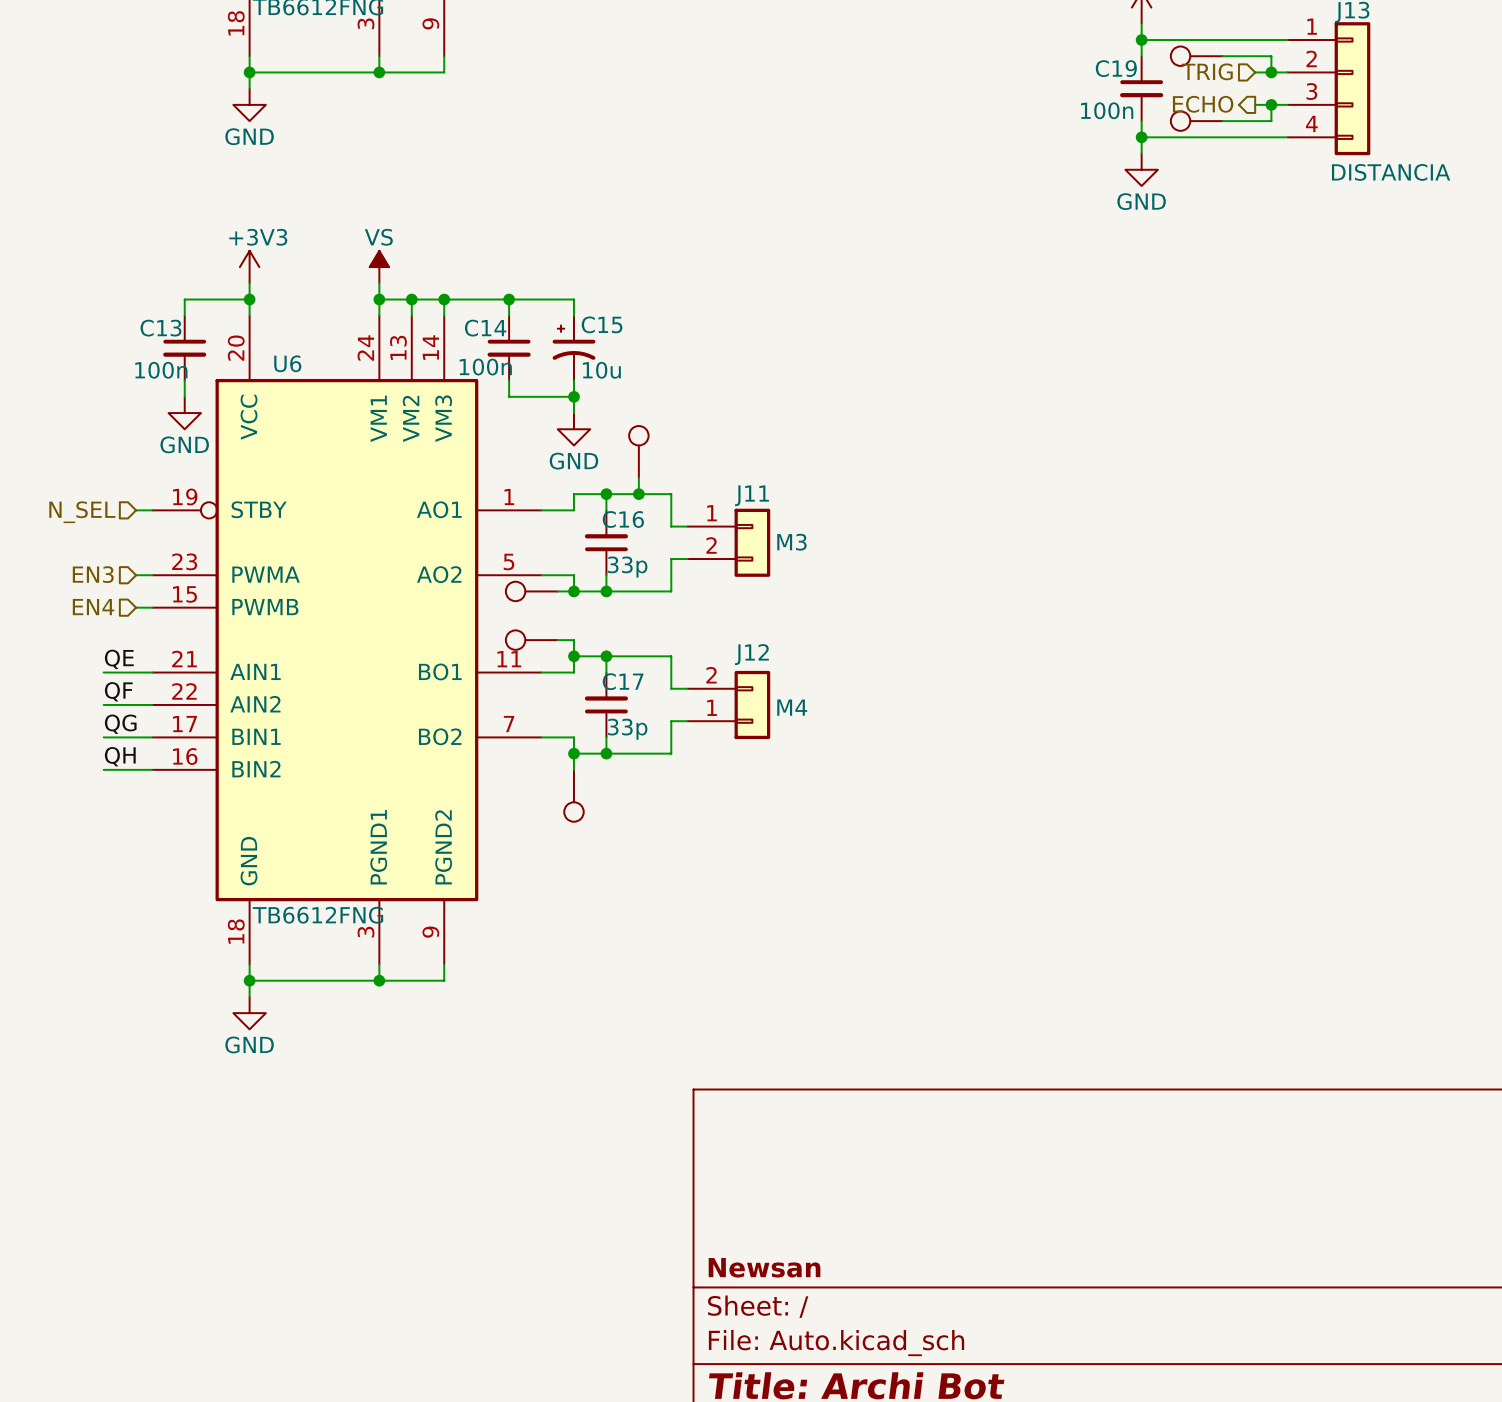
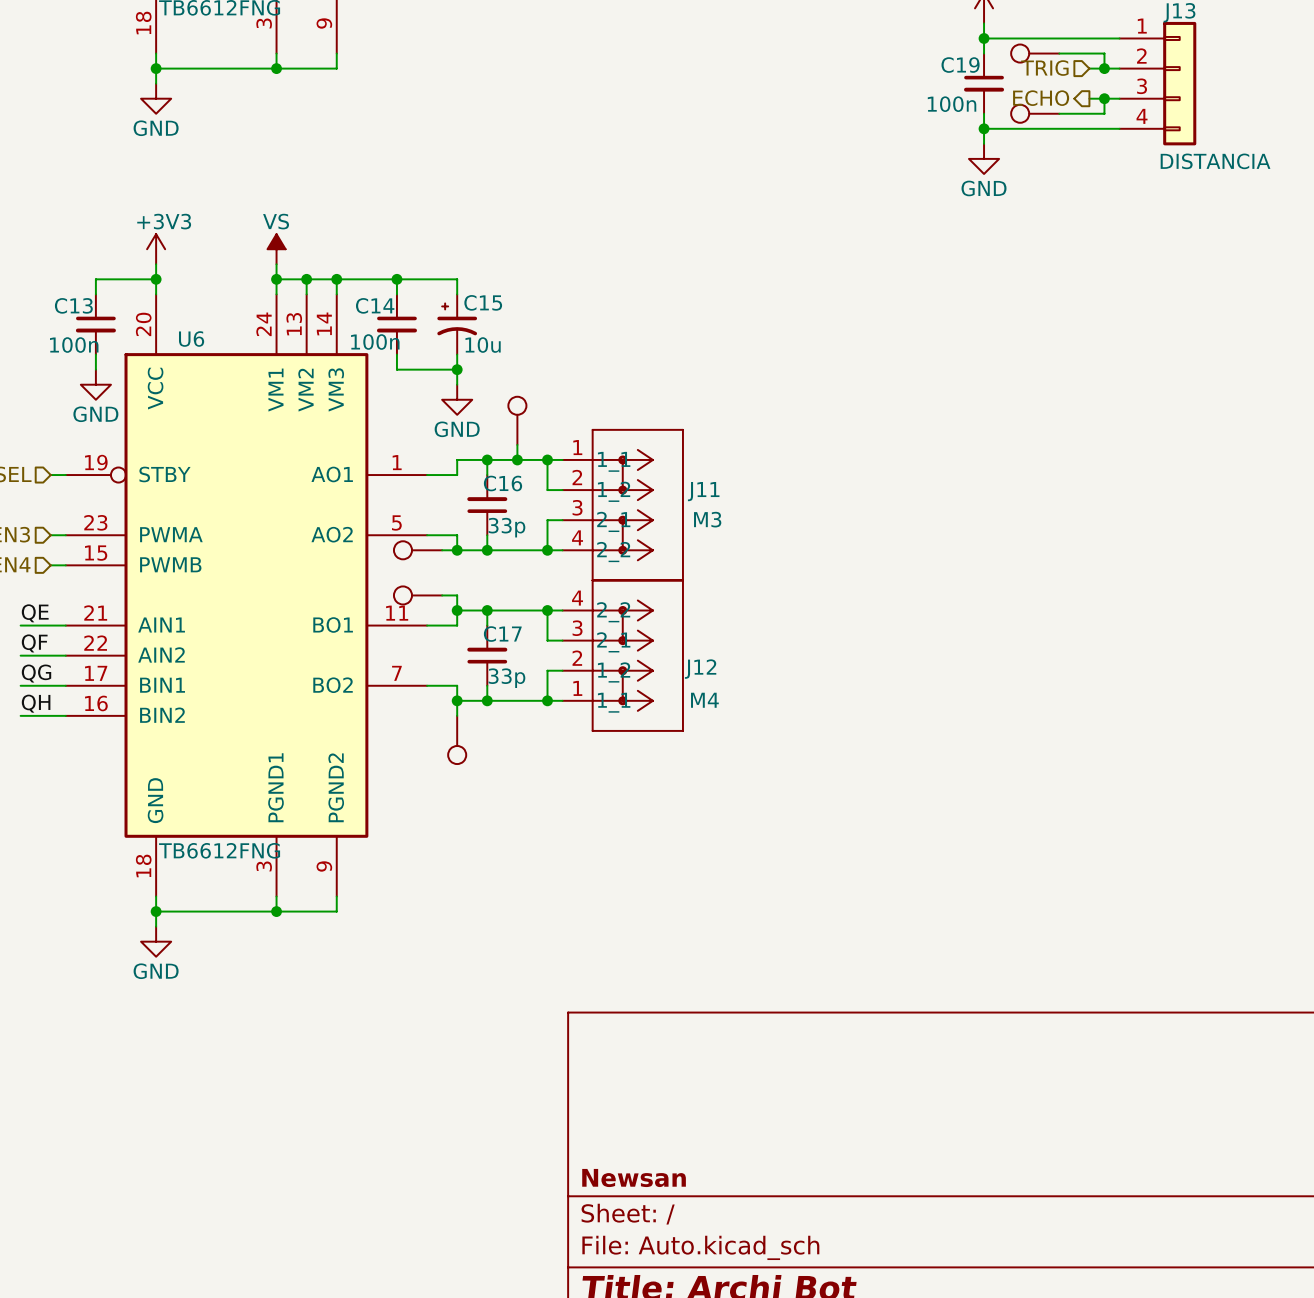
wire: none -> (547, 459) (562, 459)
junction: none -> (547, 459)
J11 name position: J11 (752, 495) -> J11 (703, 491)
J11 symbol: [687, 508, 771, 577] -> [562, 429, 684, 582]
J11 value position: M3 (791, 542) -> M3 (707, 519)
wire: none -> (547, 550) (562, 550)
junction: none -> (547, 550)
J12 name position: J12 (751, 654) -> J12 (700, 669)
wire: none -> (547, 610) (562, 610)
junction: none -> (547, 610)
J12 symbol: [687, 670, 771, 740] -> [562, 579, 684, 732]
J12 value position: M4 (792, 707) -> M4 (704, 700)
wire: none -> (547, 700) (562, 700)
junction: none -> (547, 700)

